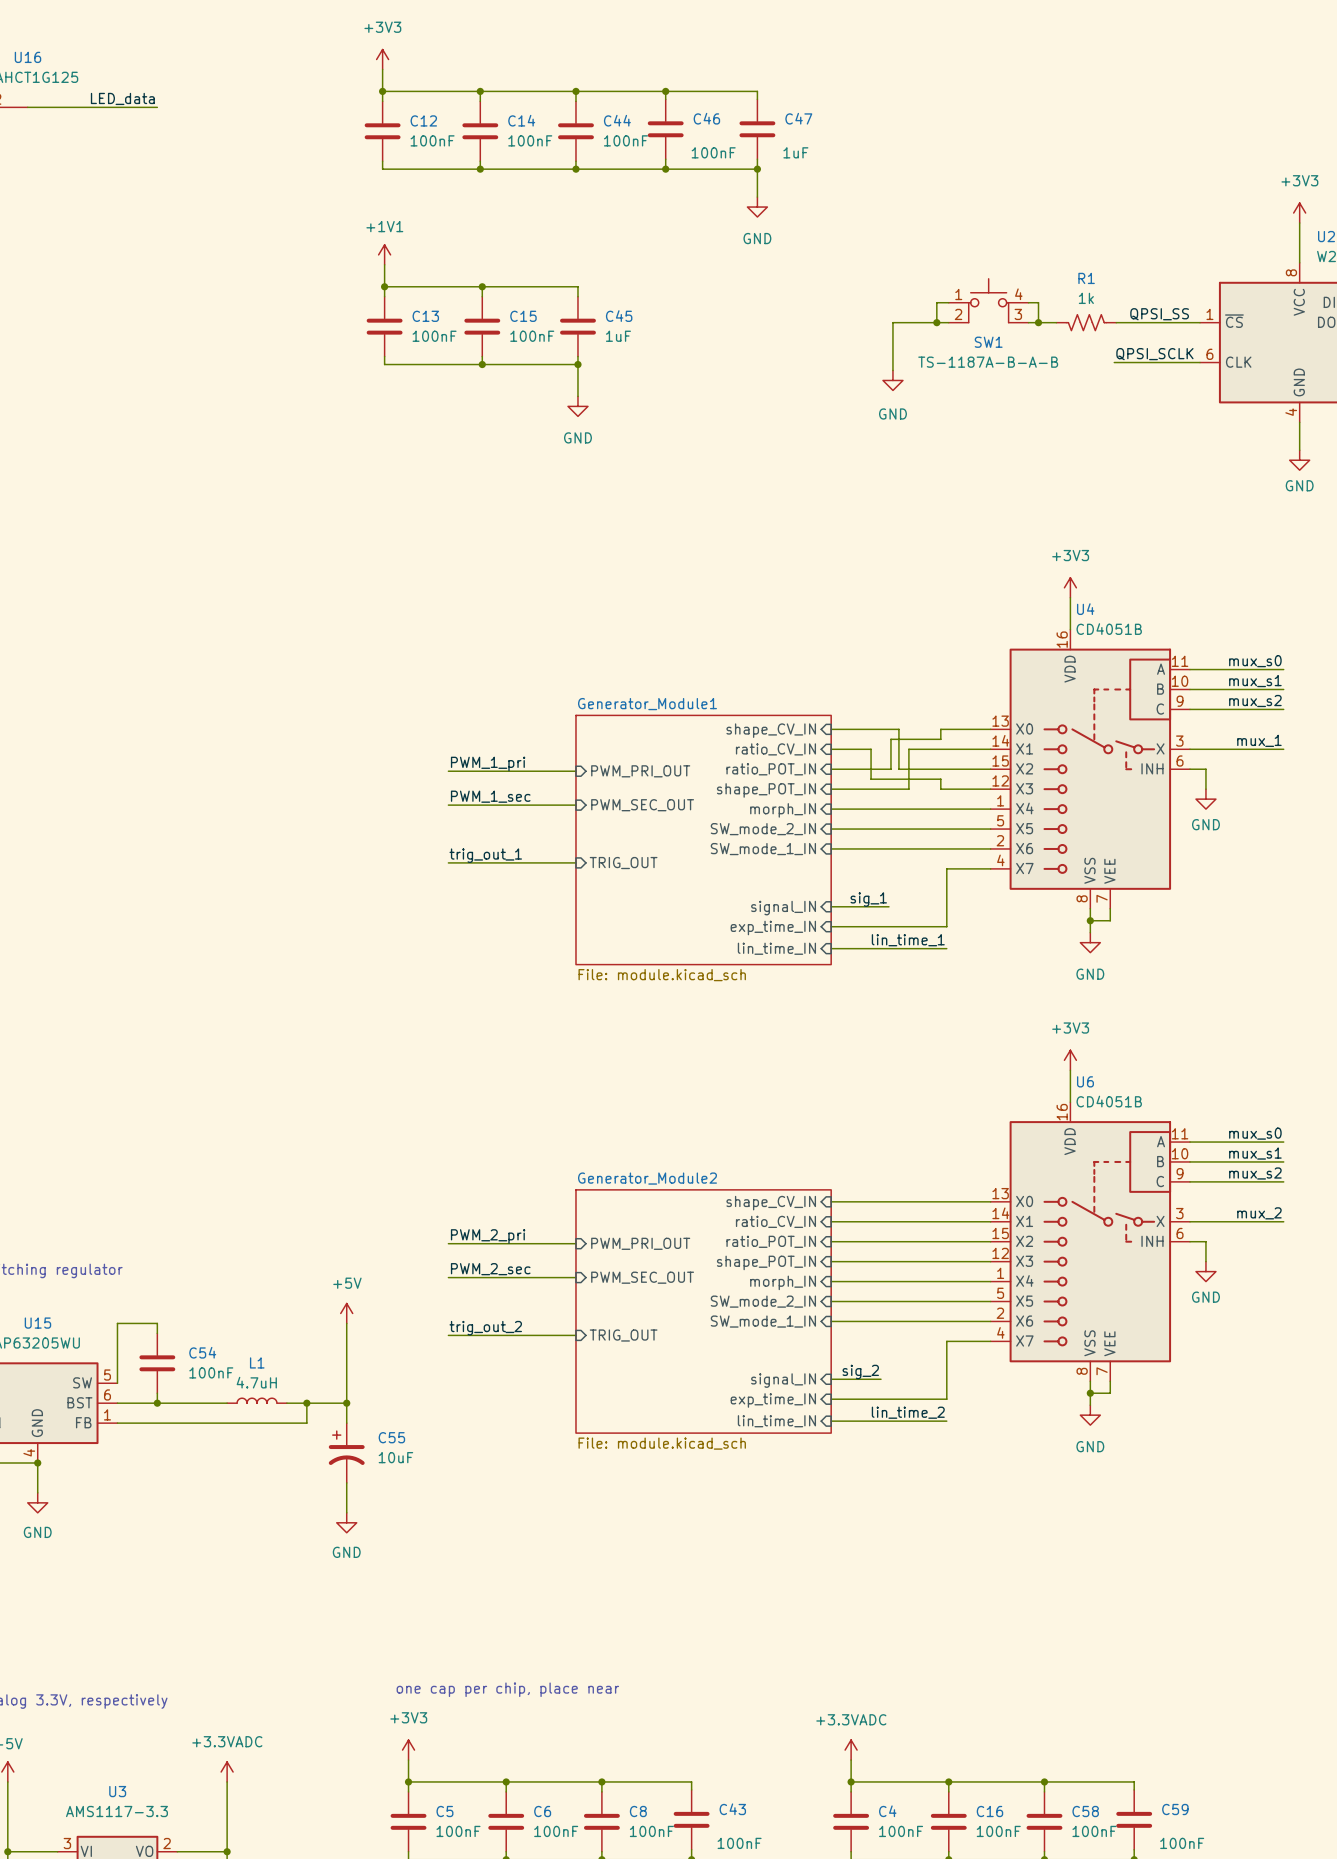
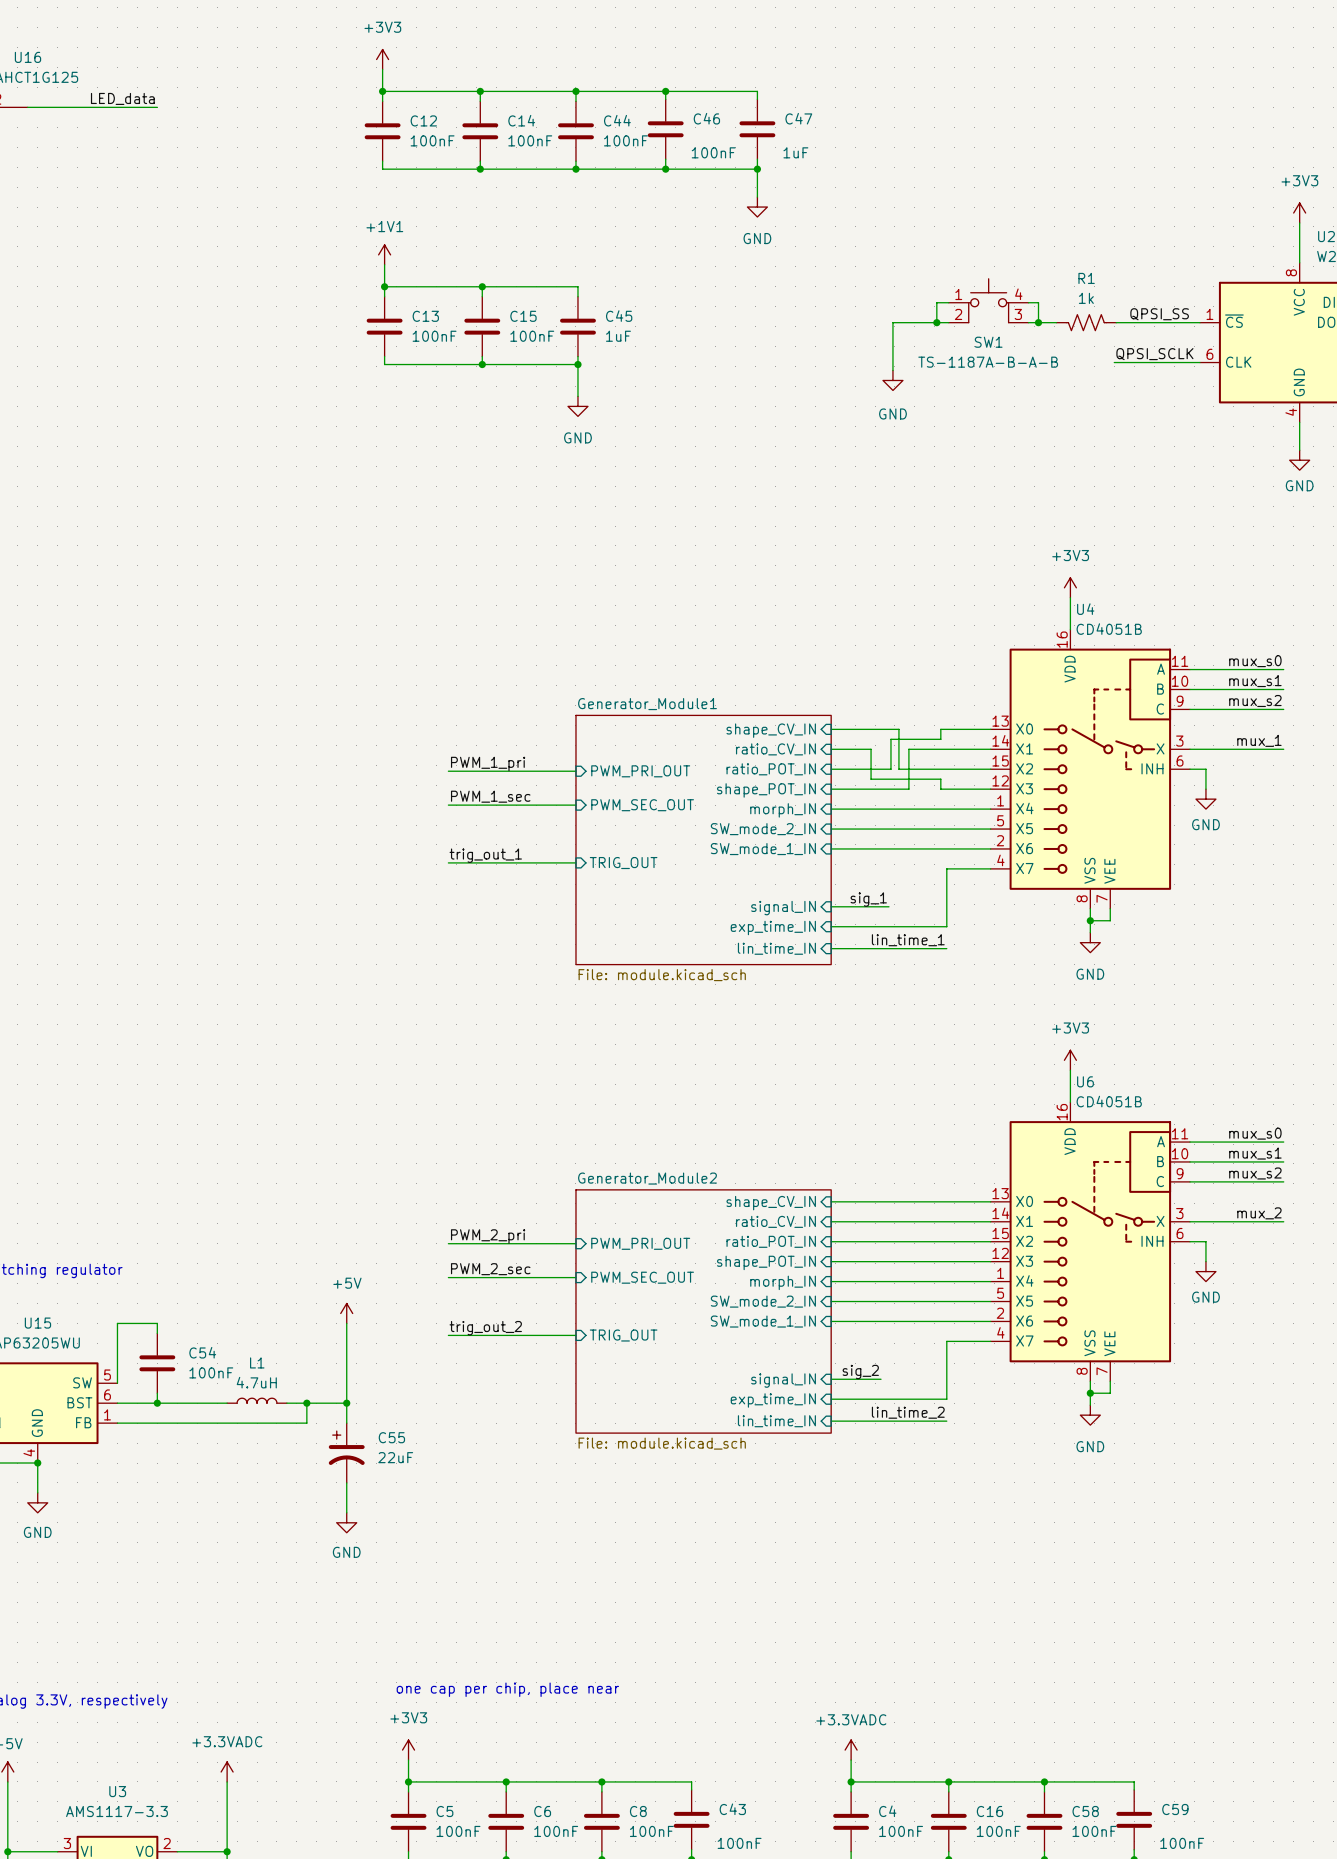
C55 value: 10uF (395, 1457) -> 22uF (395, 1457)

